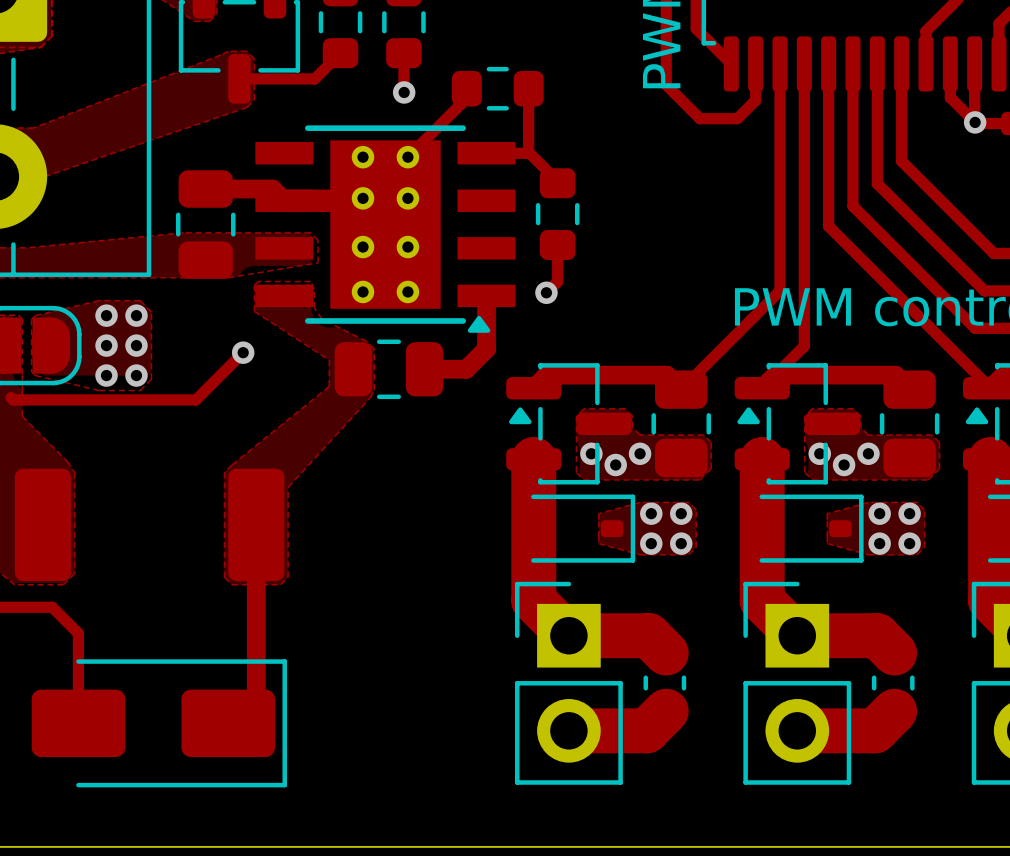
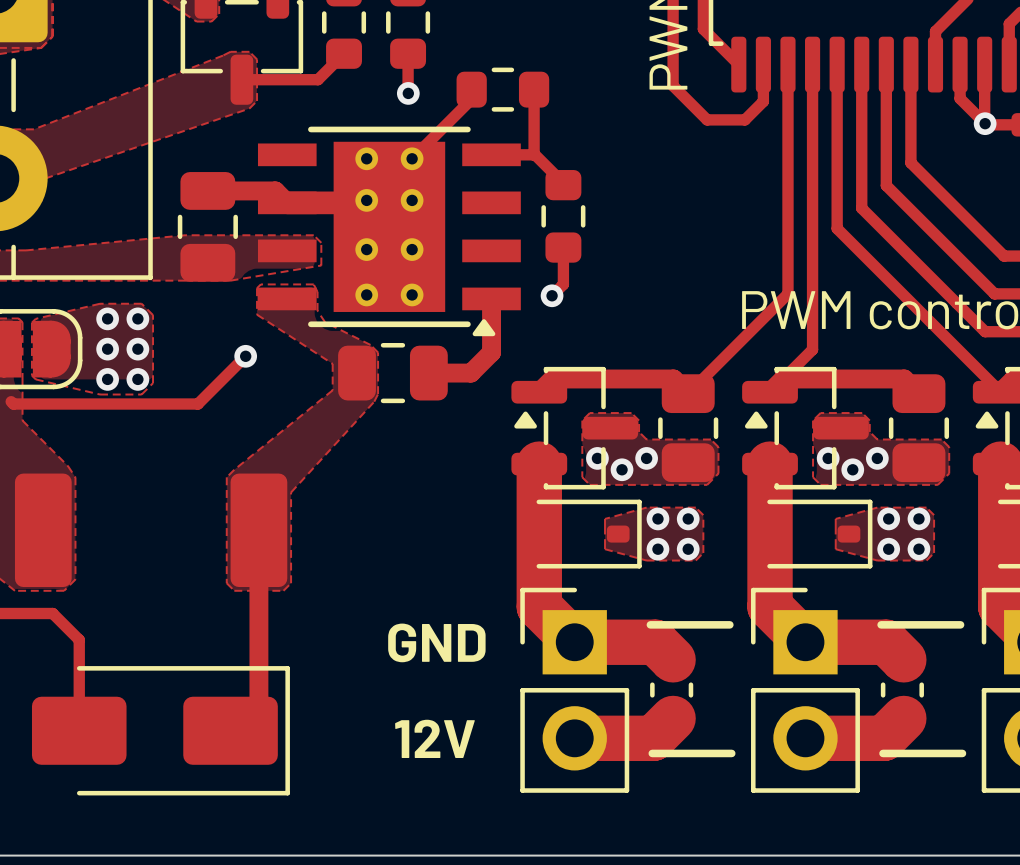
line: none -> (650, 624) (729, 624)
line: none -> (881, 624) (960, 624)
text: none -> GND (436, 642)
text: none -> 12V (434, 738)
line: none -> (652, 753) (731, 753)
line: none -> (883, 753) (962, 753)

